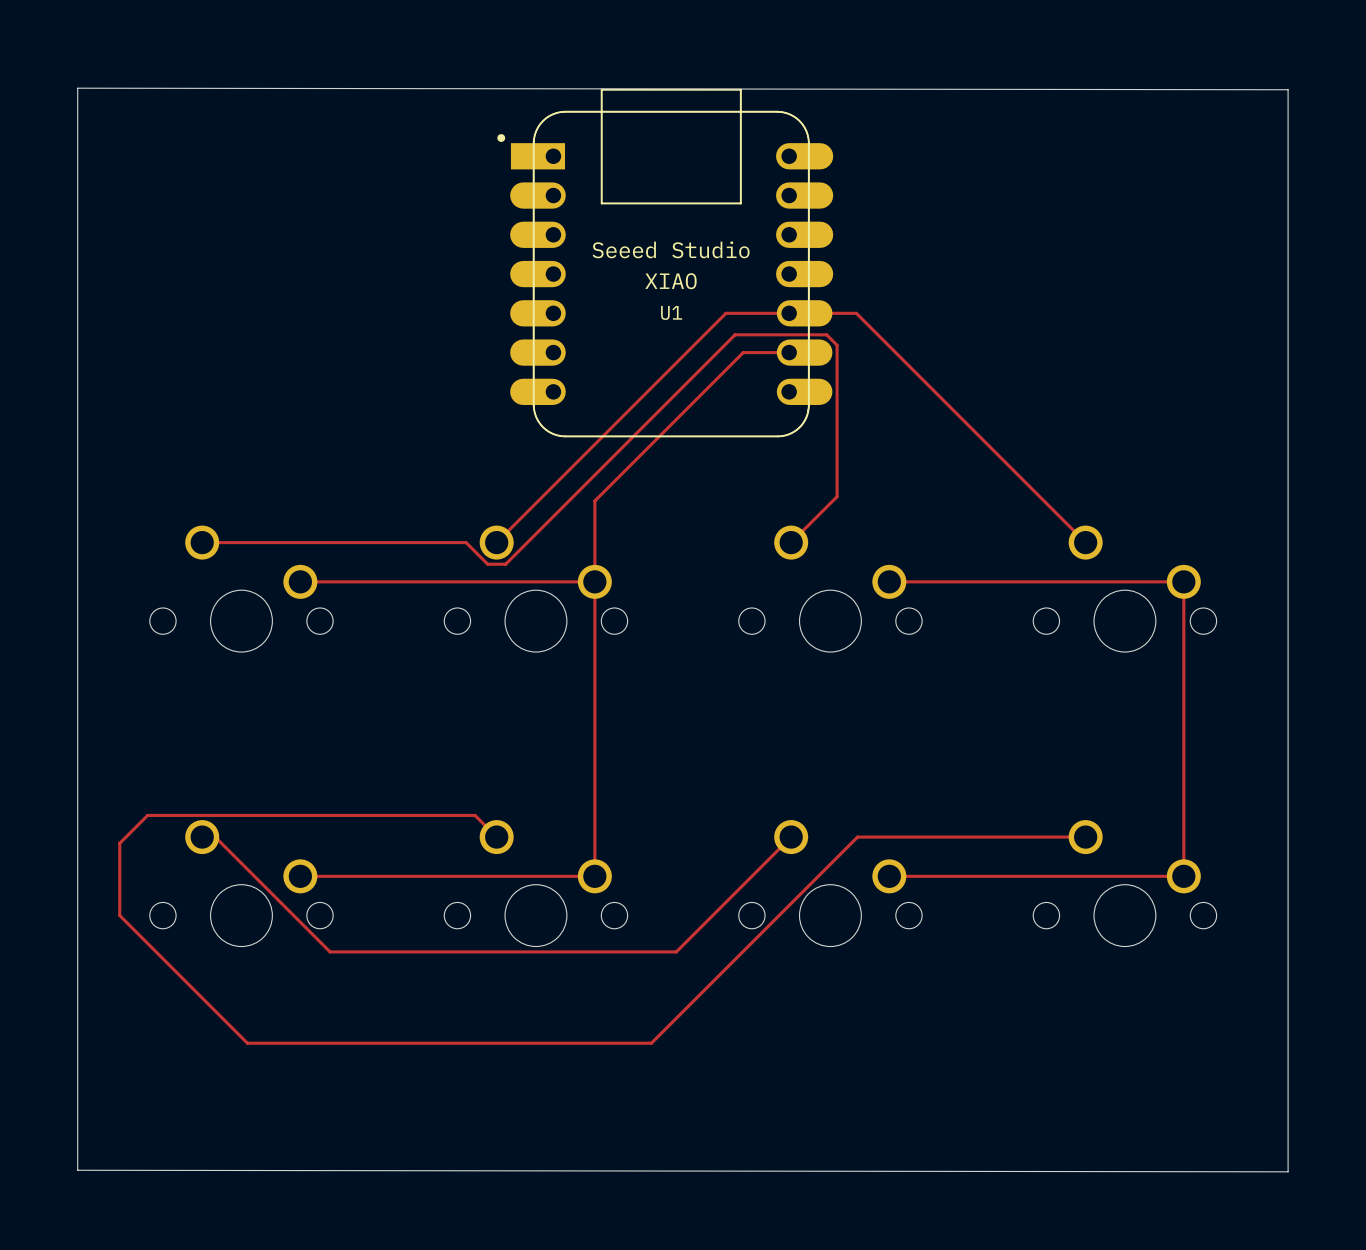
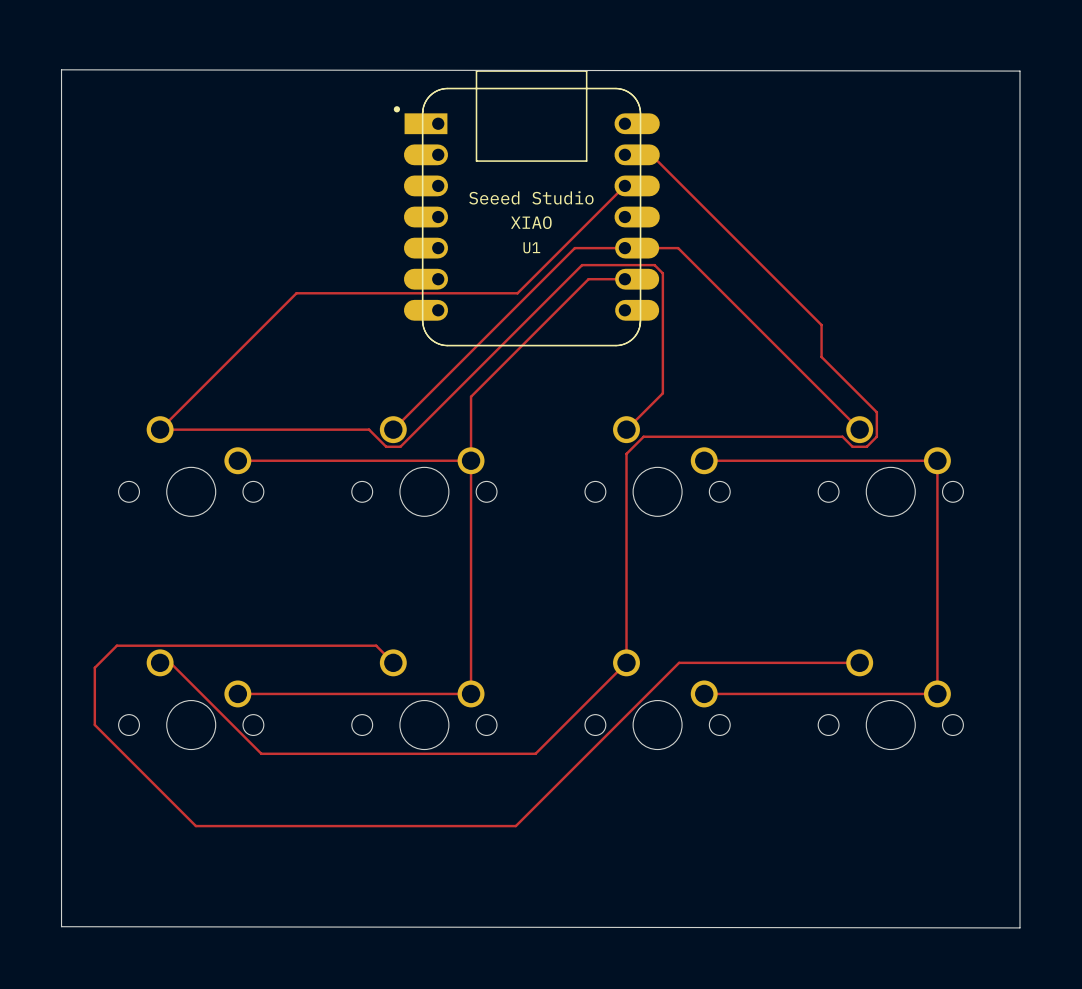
top track: none -> (624, 154) (651, 154) (821, 325) (821, 357) (876, 412) (876, 436) (866, 446) (852, 446) (842, 436) (643, 436) (626, 453) (626, 662)
top track: none -> (624, 185) (517, 293) (296, 293) (160, 429)

